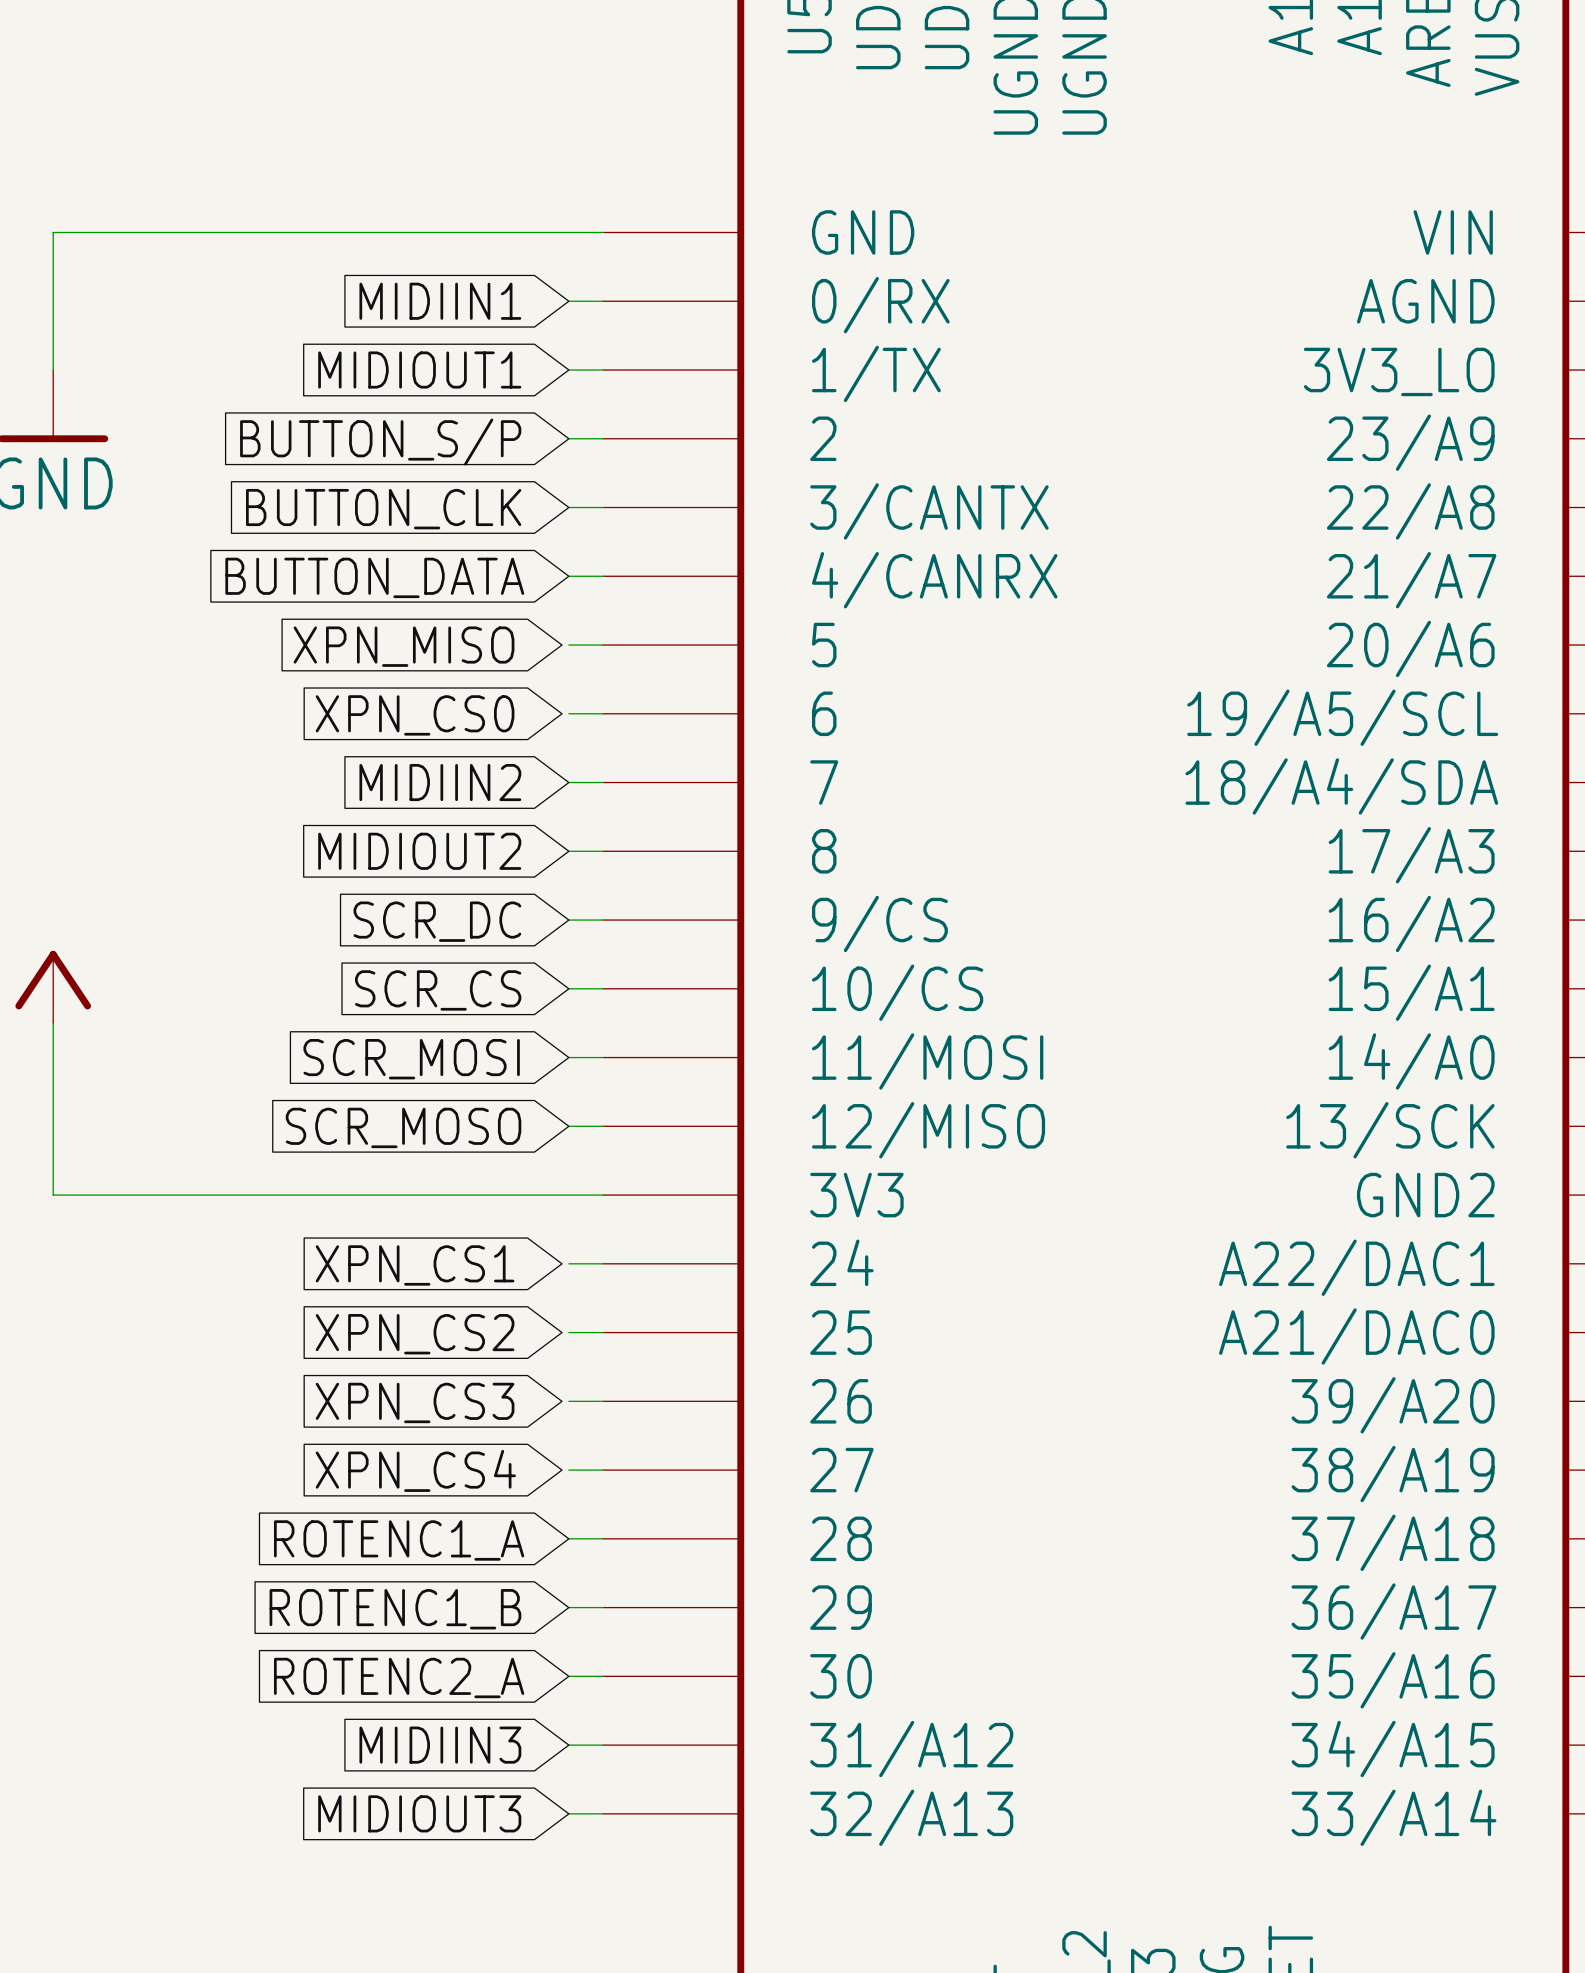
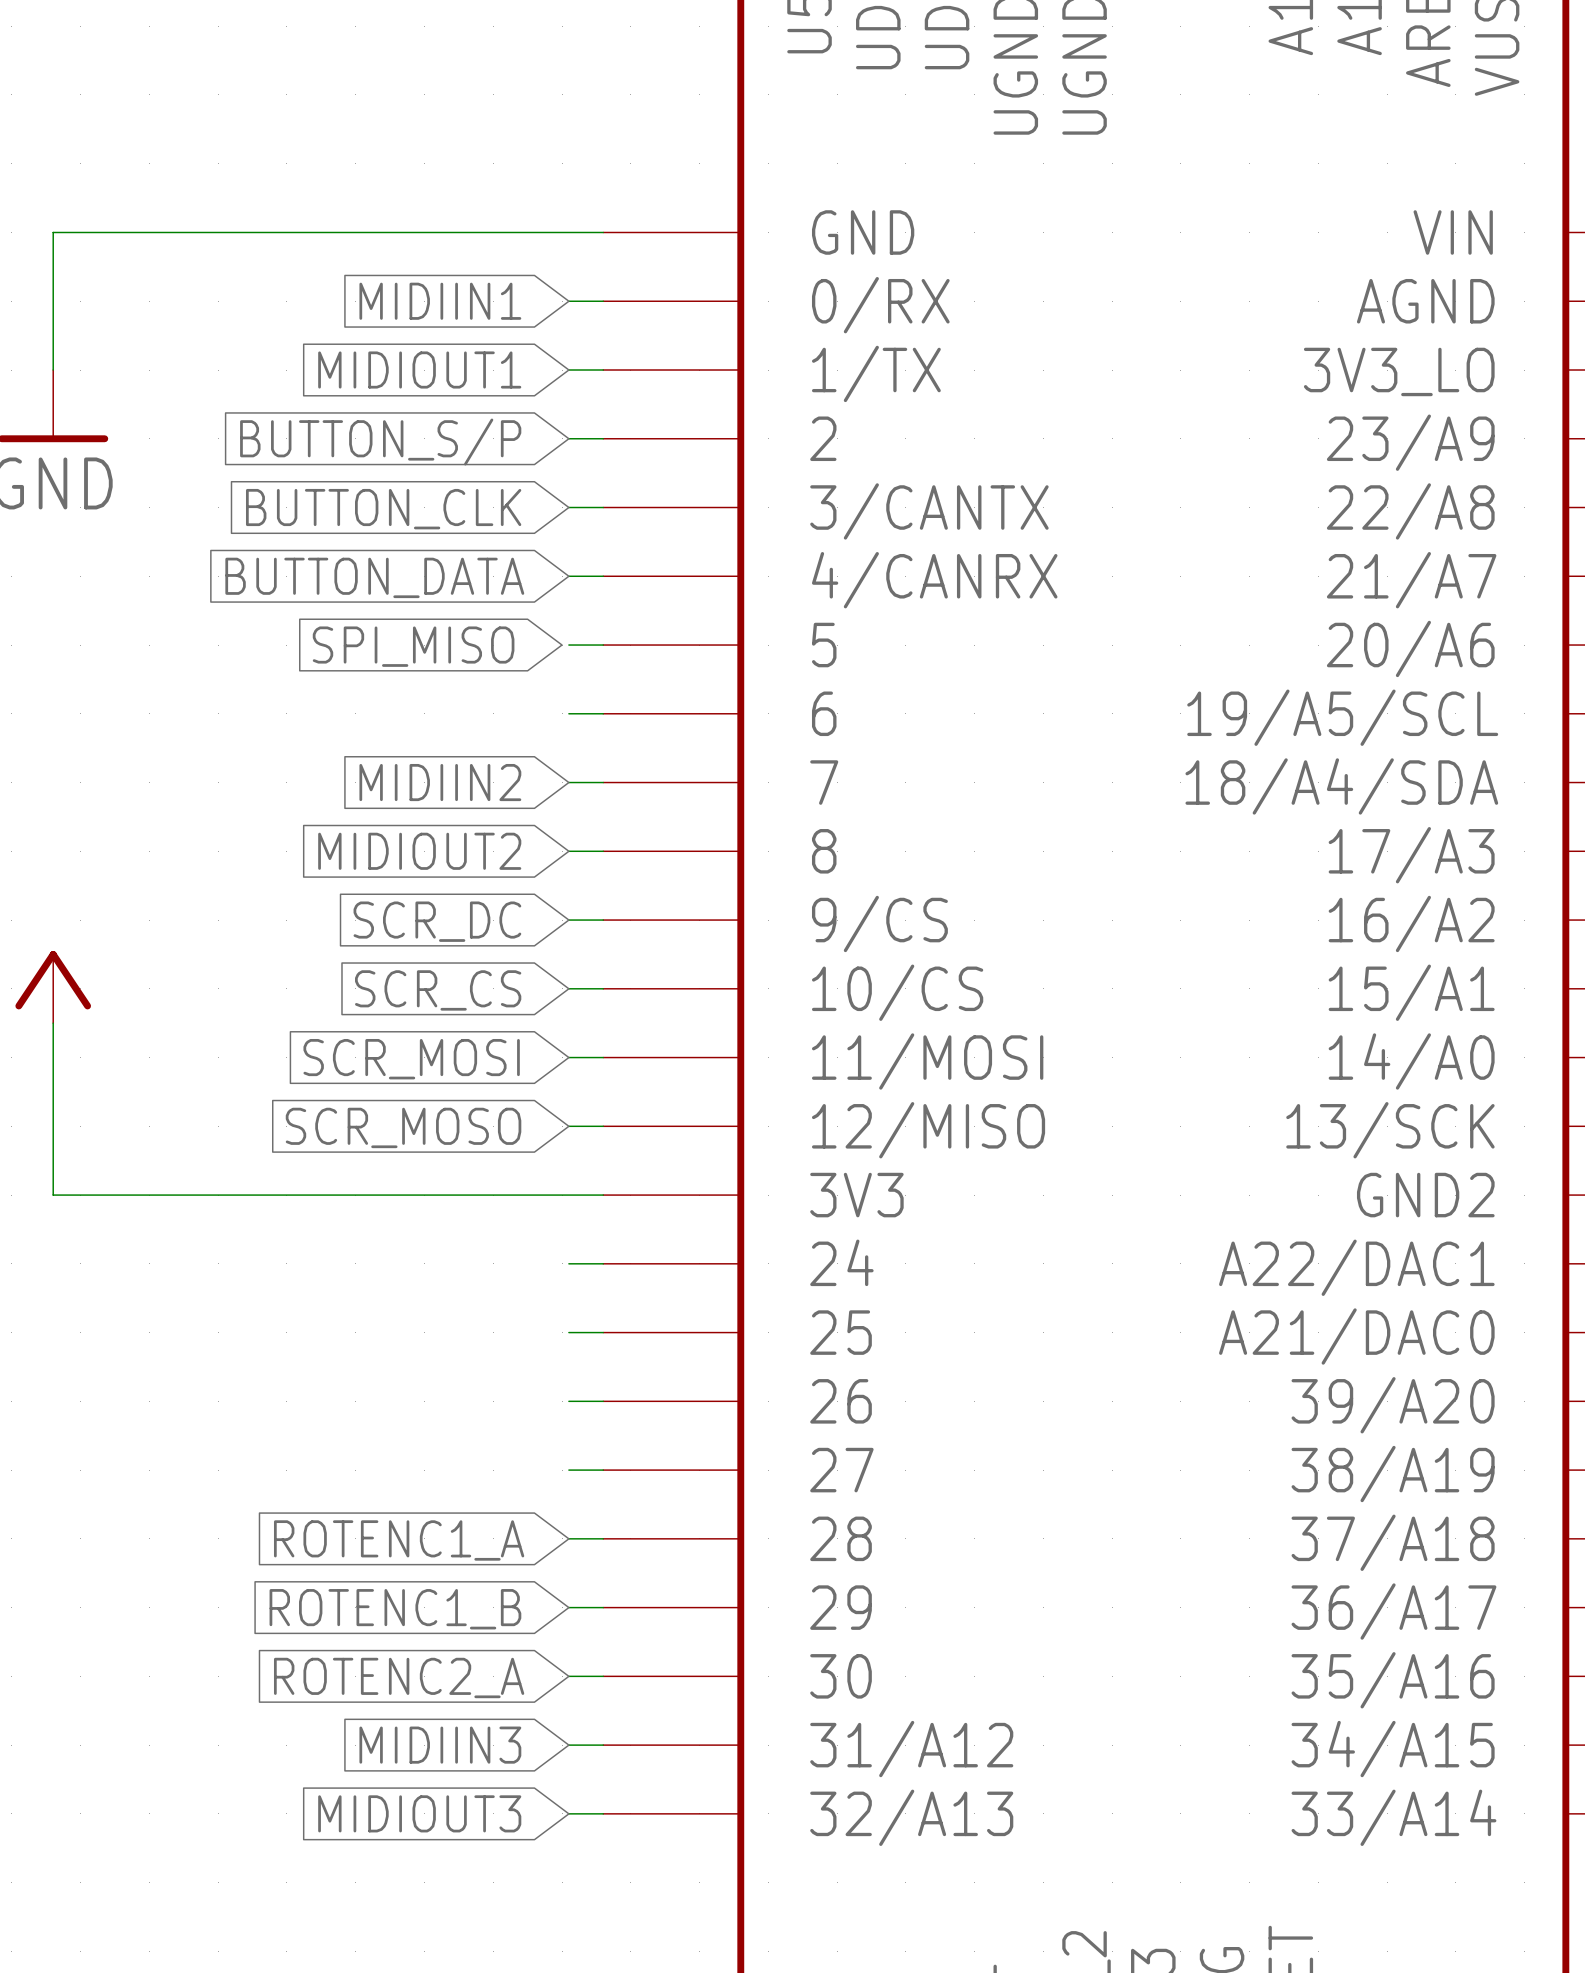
global label: XPN_MISO (404, 646) -> SPI_MISO (413, 646)
global label: XPN_CS0 (415, 715) -> none
global label: XPN_CS1 (415, 1265) -> none
global label: XPN_CS2 (415, 1334) -> none
global label: XPN_CS3 (415, 1402) -> none
global label: XPN_CS4 (415, 1470) -> none

